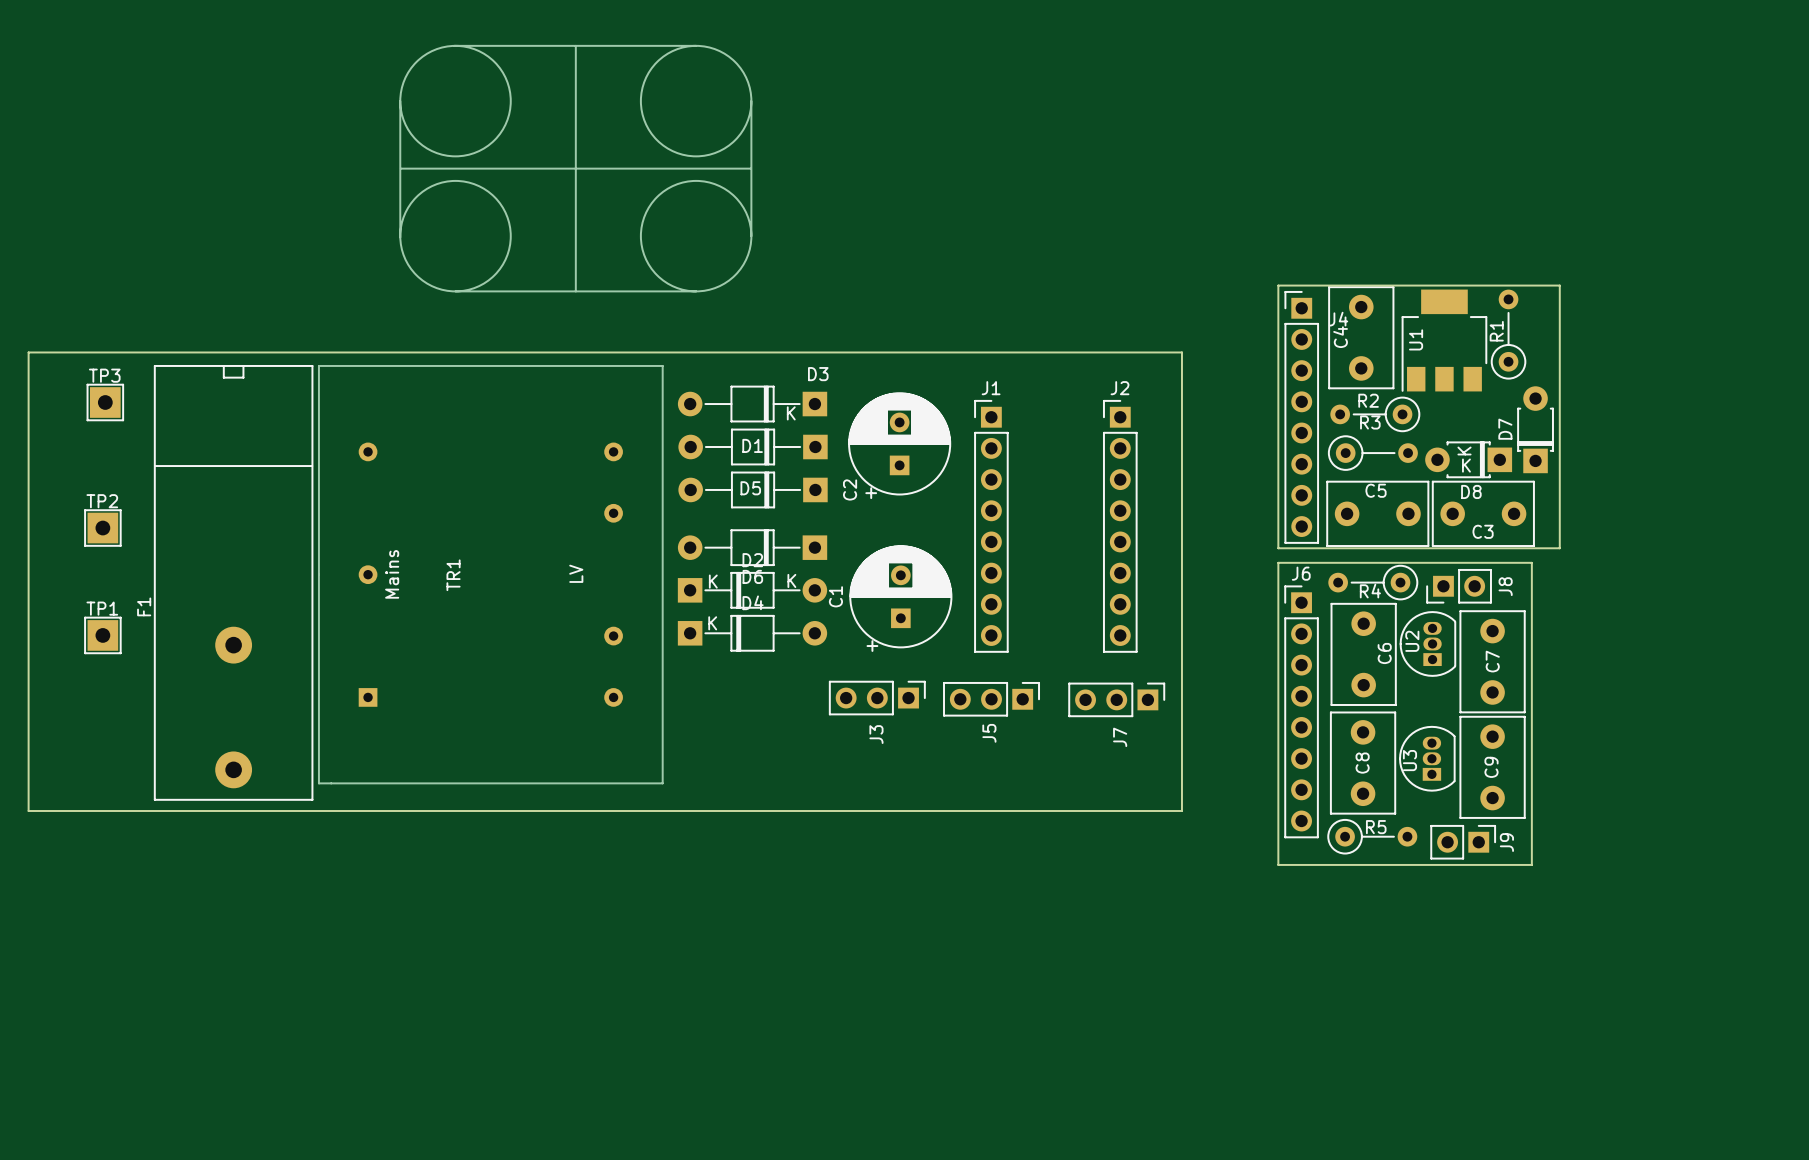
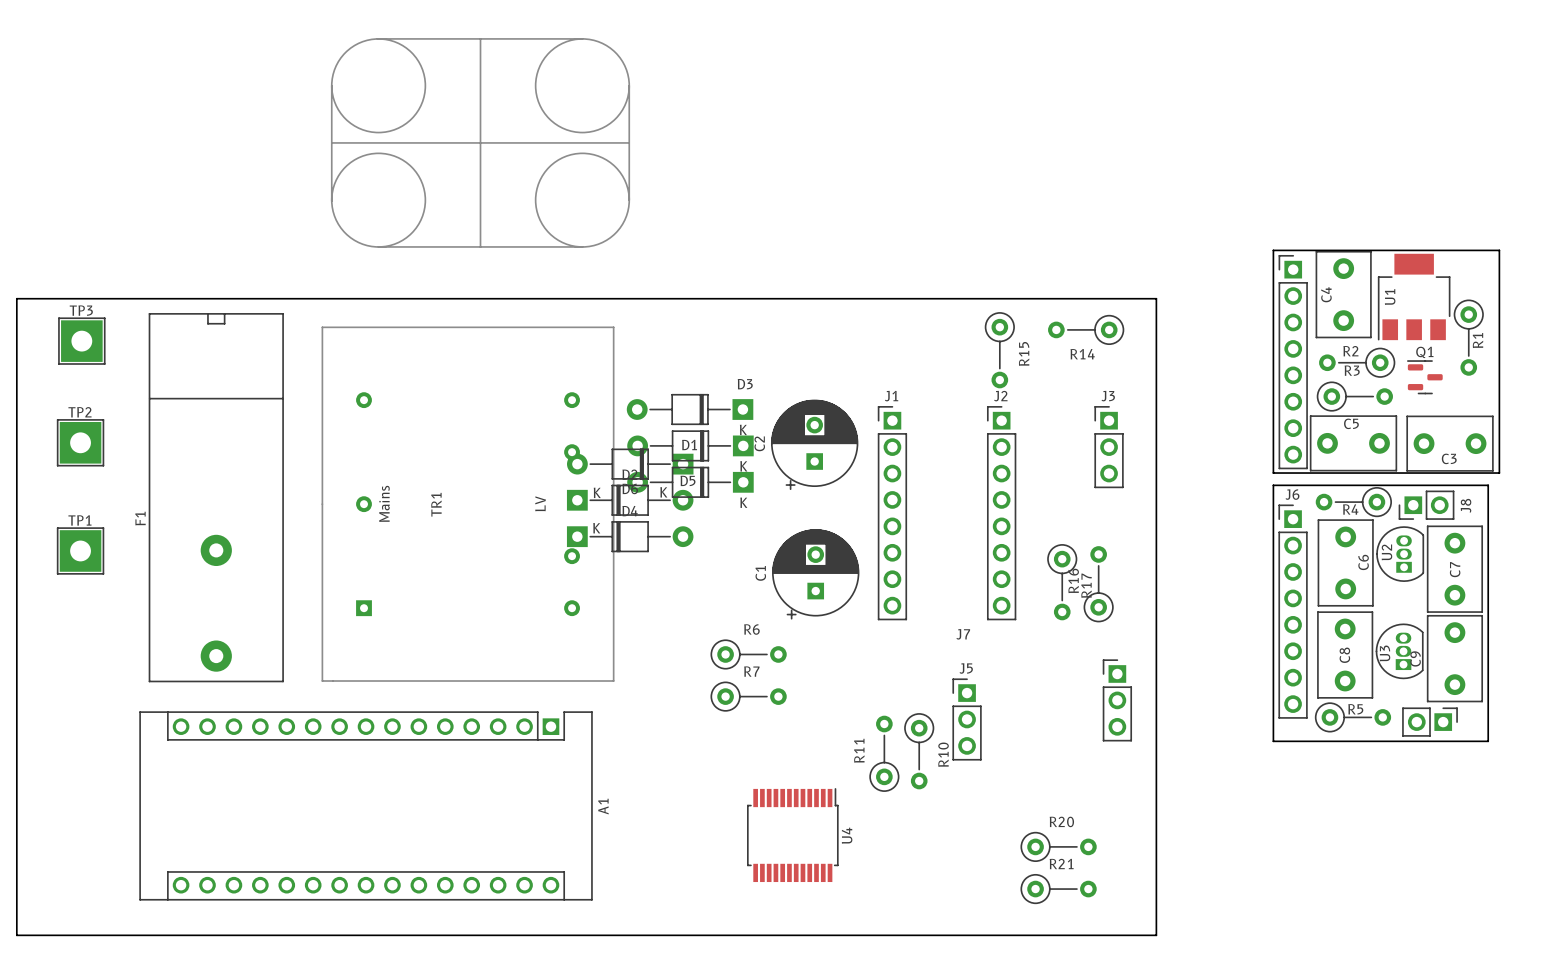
board edge: (1278, 285) (1278, 548) (1559, 548) (1559, 285) (1278, 285) -> none
board edge: none -> (1273, 250) (1273, 473) (1499, 473) (1499, 250) (1273, 250)
R1 rotation: 0° (1508, 334) -> 180° (1468, 337)
R1 position: (1508, 334) -> (1468, 337)
C4 position: (1361, 337) -> (1343, 294)
U1 position: (1444, 340) -> (1414, 297)
board edge: (1181, 352) (1181, 810) (28, 810) -> (994, 298) (1156, 298) (1156, 935) (16, 935) (16, 687)
TP3 footprint: [86, 383, 124, 422] -> [58, 317, 106, 365]
R14: none -> (1086, 329)
D3 position: (752, 404) -> (690, 409)
D3 text position: K (791, 413) -> K (743, 429)
R15: none -> (999, 350)
R2 position: (1375, 414) -> (1357, 362)
J4: (1301, 417) -> none
part: none -> (1293, 362)
D7: (1535, 429) -> none
C2 position: (899, 445) -> (814, 444)
Q1: none -> (1424, 377)
D1 position: (753, 447) -> (690, 445)
R3 position: (1373, 453) -> (1354, 396)
D8: (1468, 459) -> none
D5 position: (753, 489) -> (690, 482)
C2 name position: C2 (850, 489) -> C2 (759, 443)
TP2 footprint: [84, 509, 122, 547] -> [57, 419, 105, 467]
C5 position: (1377, 513) -> (1353, 443)
C3 position: (1483, 513) -> (1450, 443)
J1 position: (991, 526) -> (892, 513)
J2 position: (1120, 526) -> (1001, 513)
D1 text: none -> K (743, 466)
board edge: (1278, 562) (1531, 562) (1531, 864) (1278, 864) (1278, 562) -> (1273, 485) (1488, 485) (1488, 741) (1273, 741) (1273, 485)
TR1 position: (490, 574) -> (468, 504)
F1 position: (233, 582) -> (216, 497)
R4 position: (1373, 582) -> (1353, 502)
J8 position: (1459, 586) -> (1426, 505)
D5 text: none -> K (743, 502)
C1 position: (900, 598) -> (815, 574)
TP1 footprint: [84, 616, 122, 654] -> [57, 527, 105, 575]
U2 position: (1427, 643) -> (1400, 554)
C6 position: (1363, 654) -> (1345, 562)
C7 position: (1492, 661) -> (1454, 569)
R17: none -> (1062, 582)
R16: none -> (1098, 584)
J3 rotation: 0° (877, 698) -> 90° counterclockwise (1109, 447)
J3 position: (877, 698) -> (1109, 447)
J5 rotation: 0° (991, 699) -> 90° counterclockwise (967, 719)
J5 position: (991, 699) -> (967, 719)
J7 rotation: 0° (1116, 699) -> 90° counterclockwise (1117, 700)
J7 position: (1116, 699) -> (1117, 700)
J6 position: (1301, 711) -> (1293, 611)
J5 name position: J5 (989, 733) -> J5 (966, 668)
J3 name position: J3 (876, 734) -> J3 (1108, 396)
J7 name position: J7 (1120, 737) -> J7 (963, 634)
U3 position: (1427, 758) -> (1399, 651)
C8 position: (1363, 763) -> (1345, 654)
C9 name position: C9 (1491, 767) -> C9 (1415, 658)
C9 position: (1492, 767) -> (1454, 658)
R6: none -> (748, 654)
R7: none -> (748, 696)
R5 position: (1372, 836) -> (1353, 717)
J9: (1463, 842) -> none
part: none -> (1430, 722)
R10: none -> (919, 751)
R11: none -> (884, 753)
A1: none -> (366, 805)
U4: none -> (792, 835)
R20: none -> (1058, 846)
R21: none -> (1058, 889)

